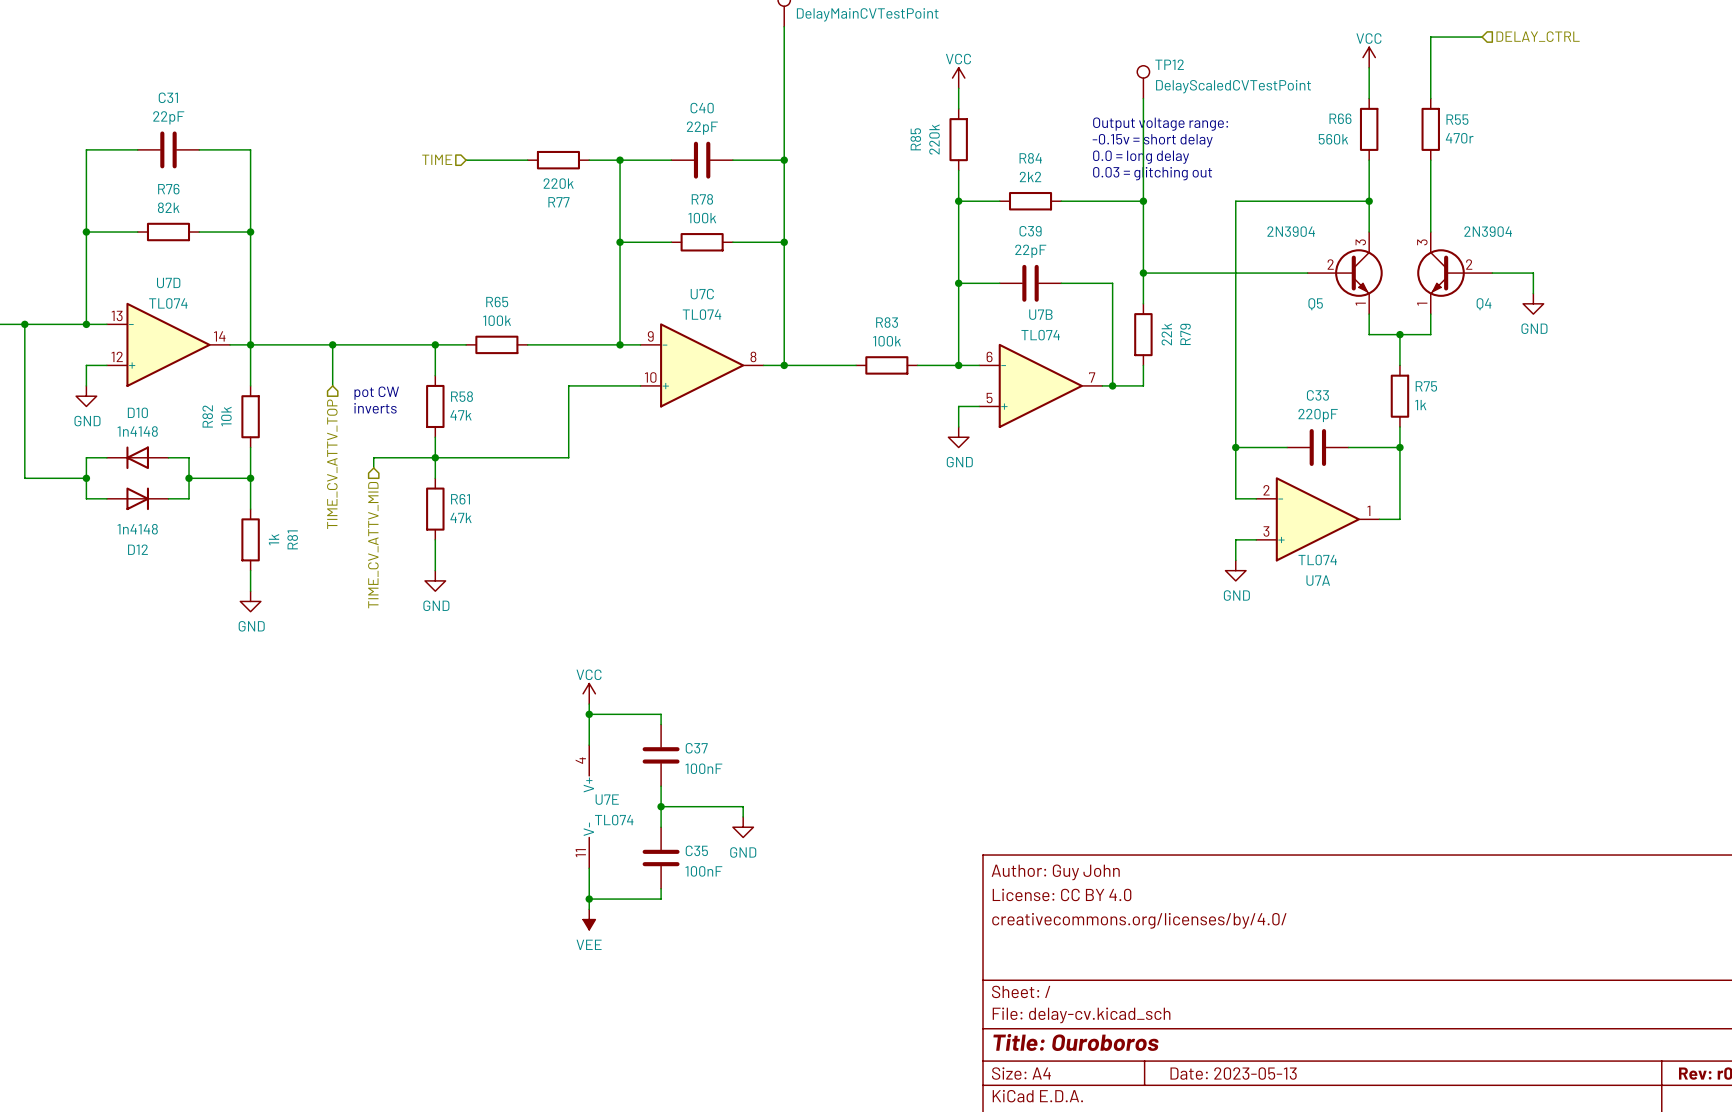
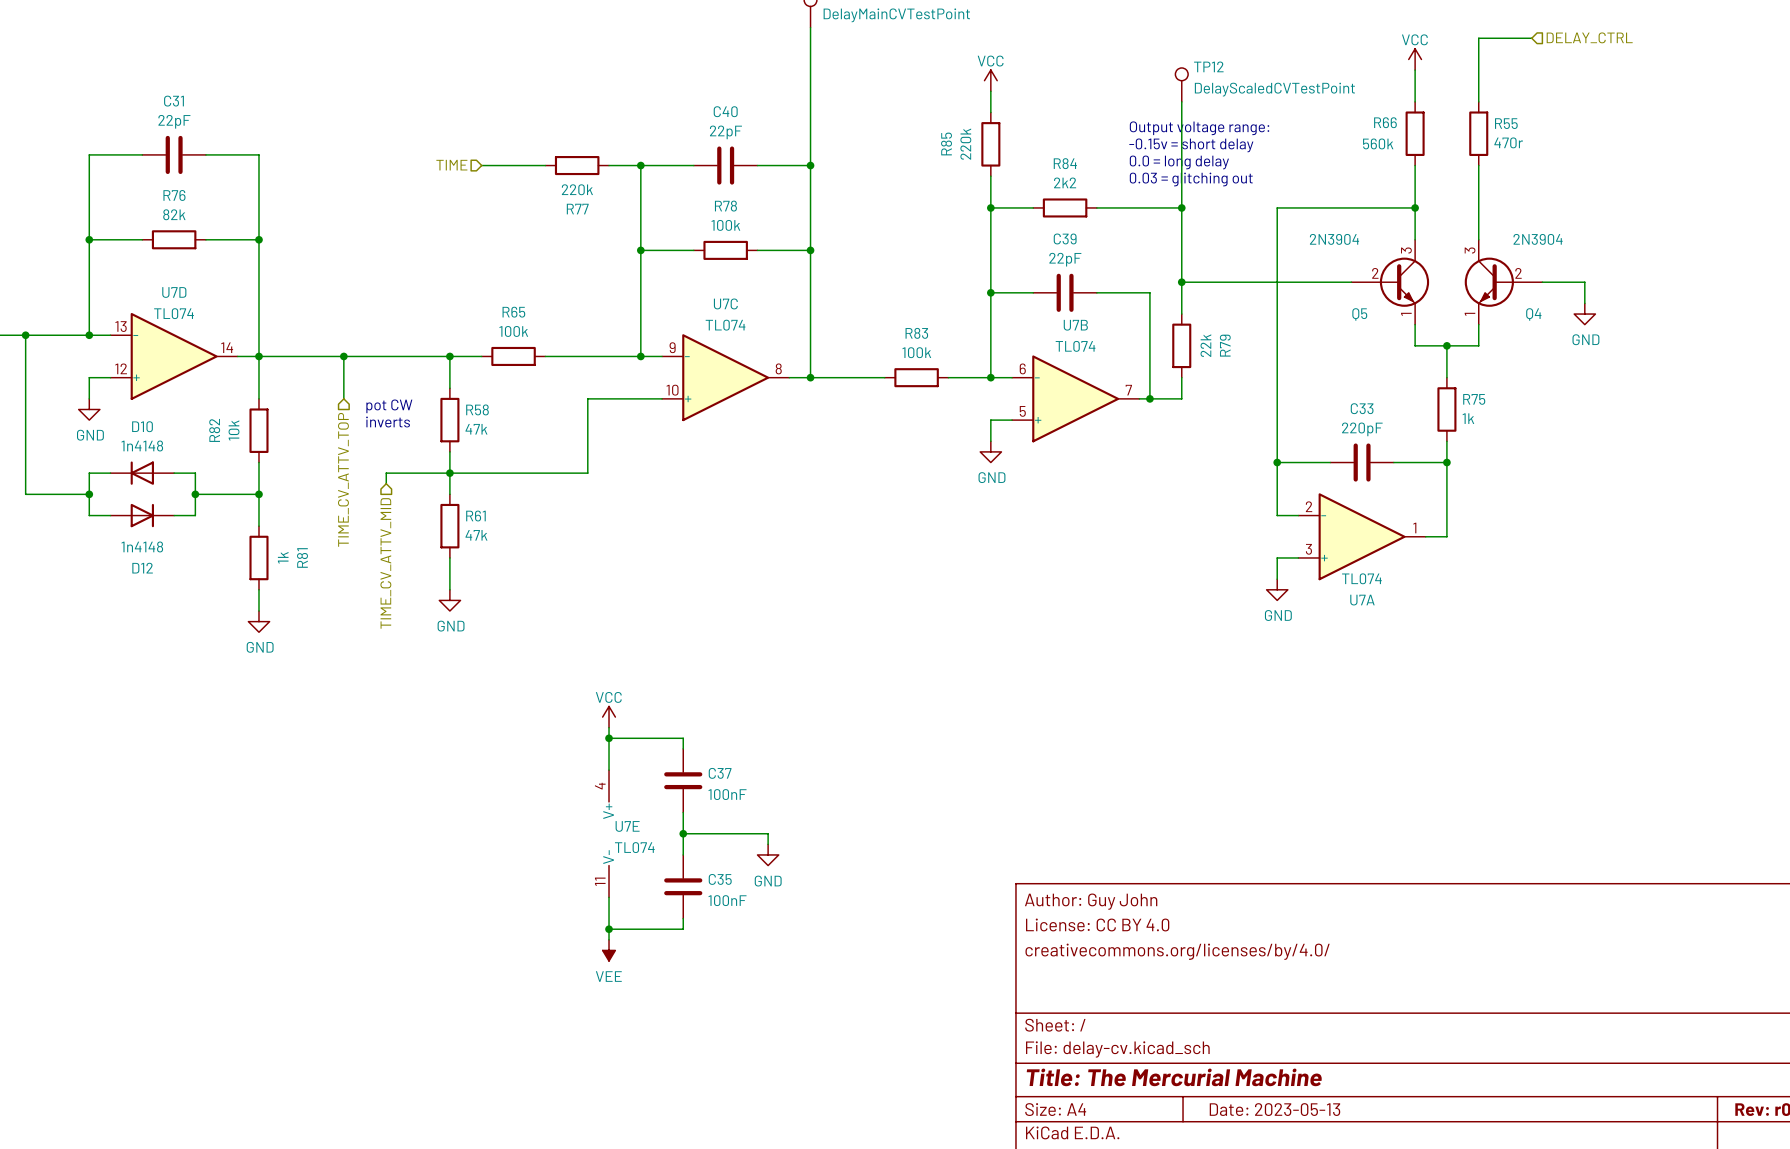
title block: Title: Ouroboros (1076, 1042) -> Title: The Mercurial Machine (1174, 1077)

